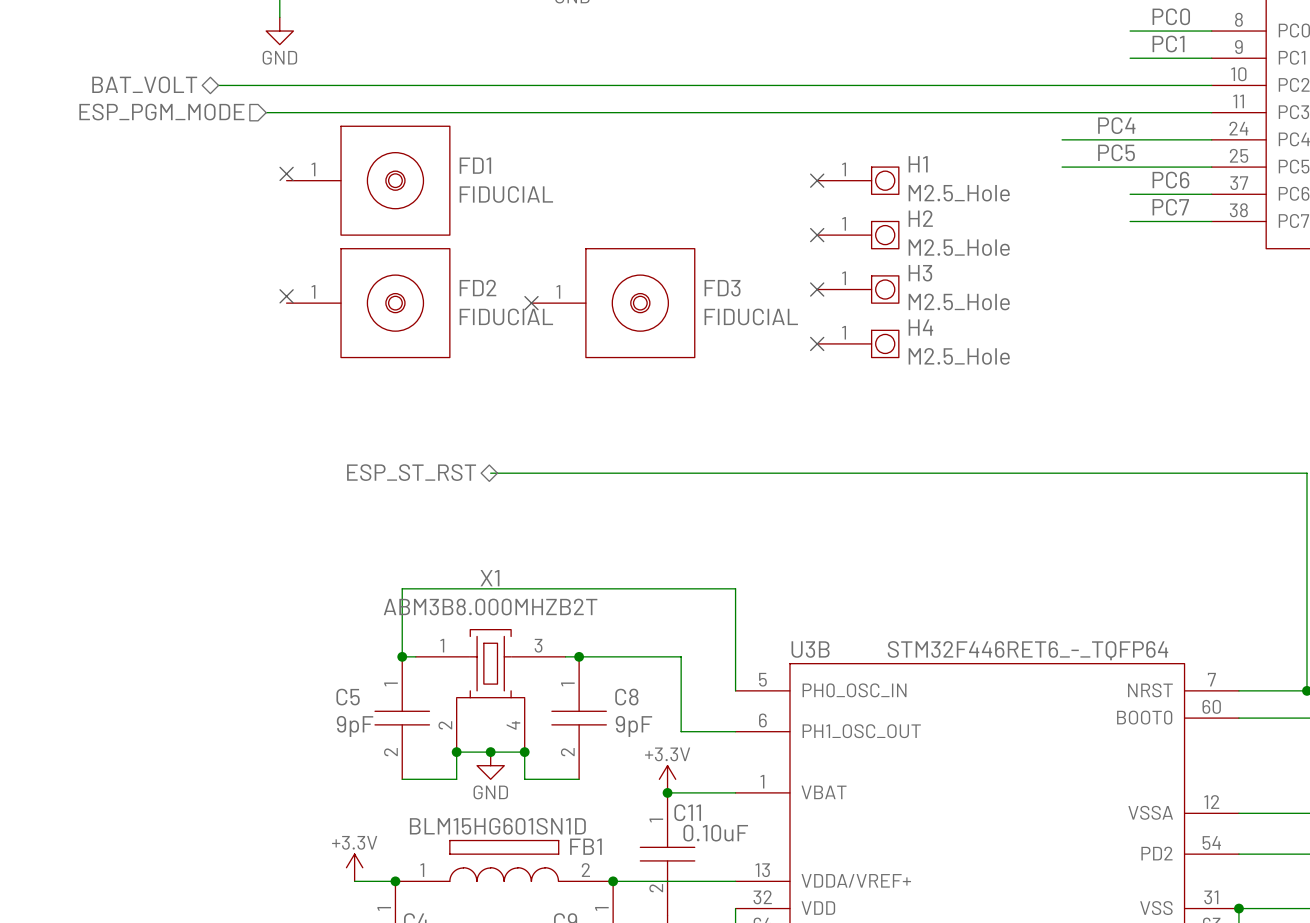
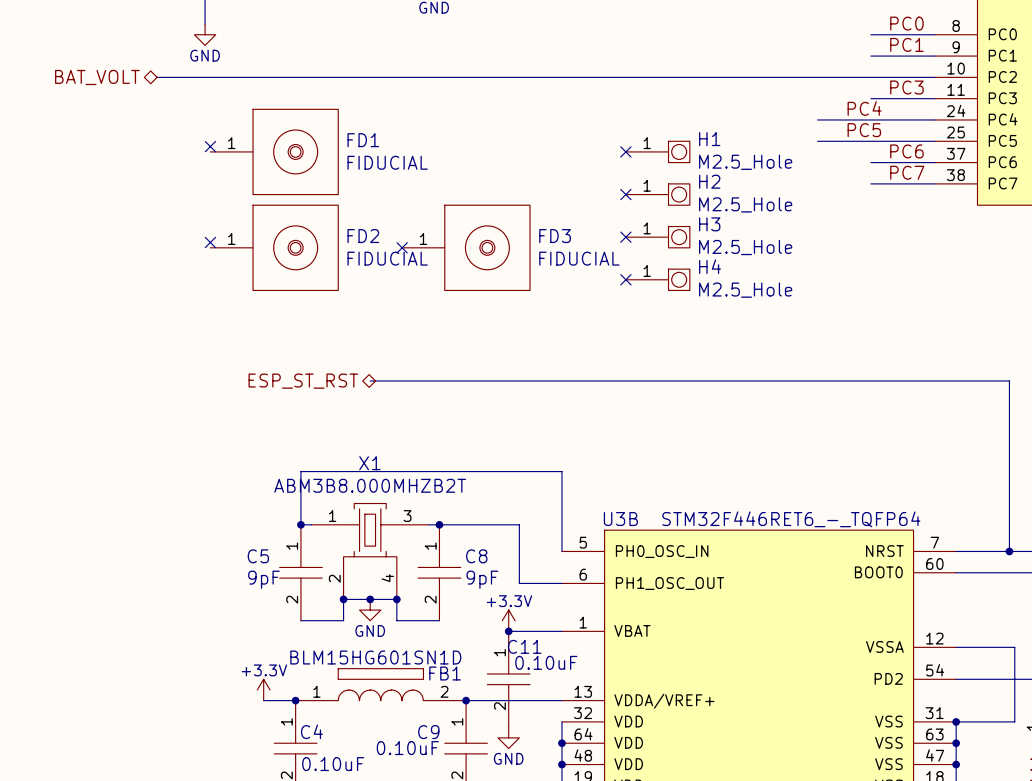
label: none -> PC3 (906, 87)
hierarchical label: ESP_PGM_MODE (161, 112) -> none
wire: (266, 112) (1130, 112) -> none

